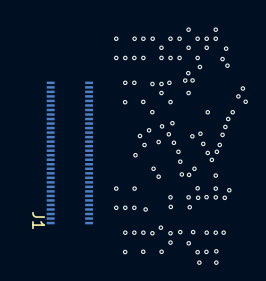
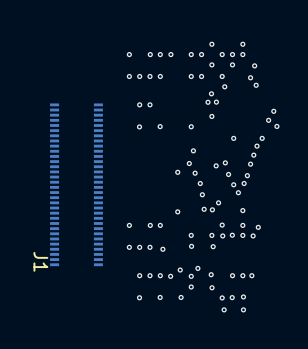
via: (161, 47) -> none
via: (161, 57) -> none
via: (169, 82) -> none
via: (152, 83) -> none
via: (161, 83) -> none
via: (161, 93) -> none
via: (152, 112) -> none
via: (162, 126) -> none
via: (149, 130) -> none
via: (139, 135) -> none
via: (144, 145) -> none
via: (135, 155) -> none
via: (153, 168) -> none
via: none -> (160, 225)
via: none -> (197, 268)
via: none -> (211, 274)
via: (180, 232) -> none
via: (193, 232) -> none

